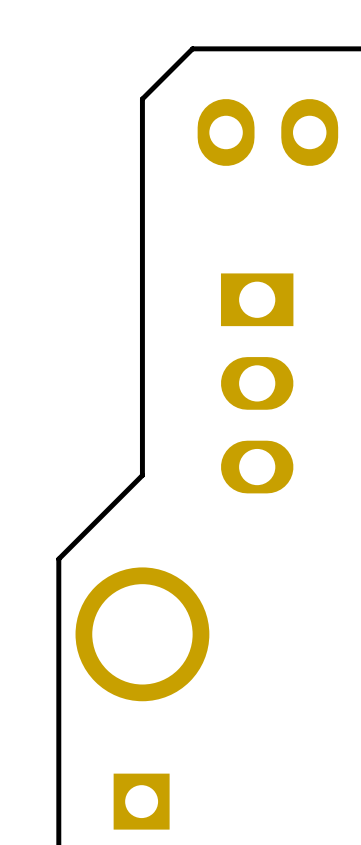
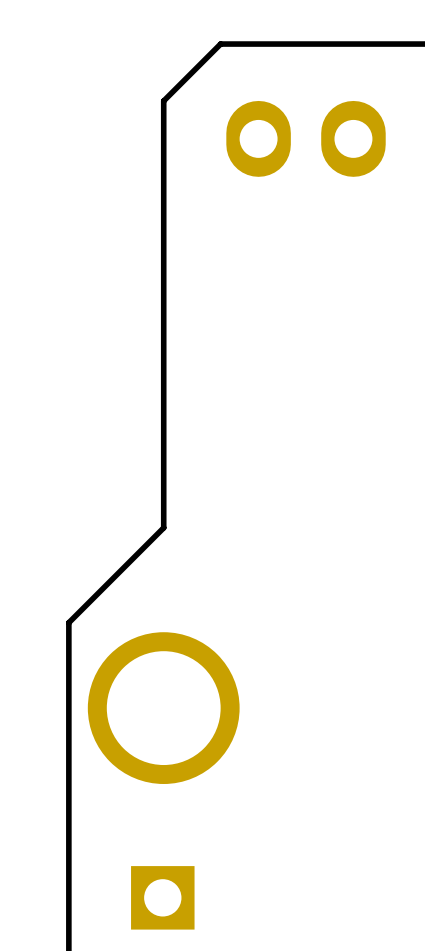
part: (257, 383) -> none

